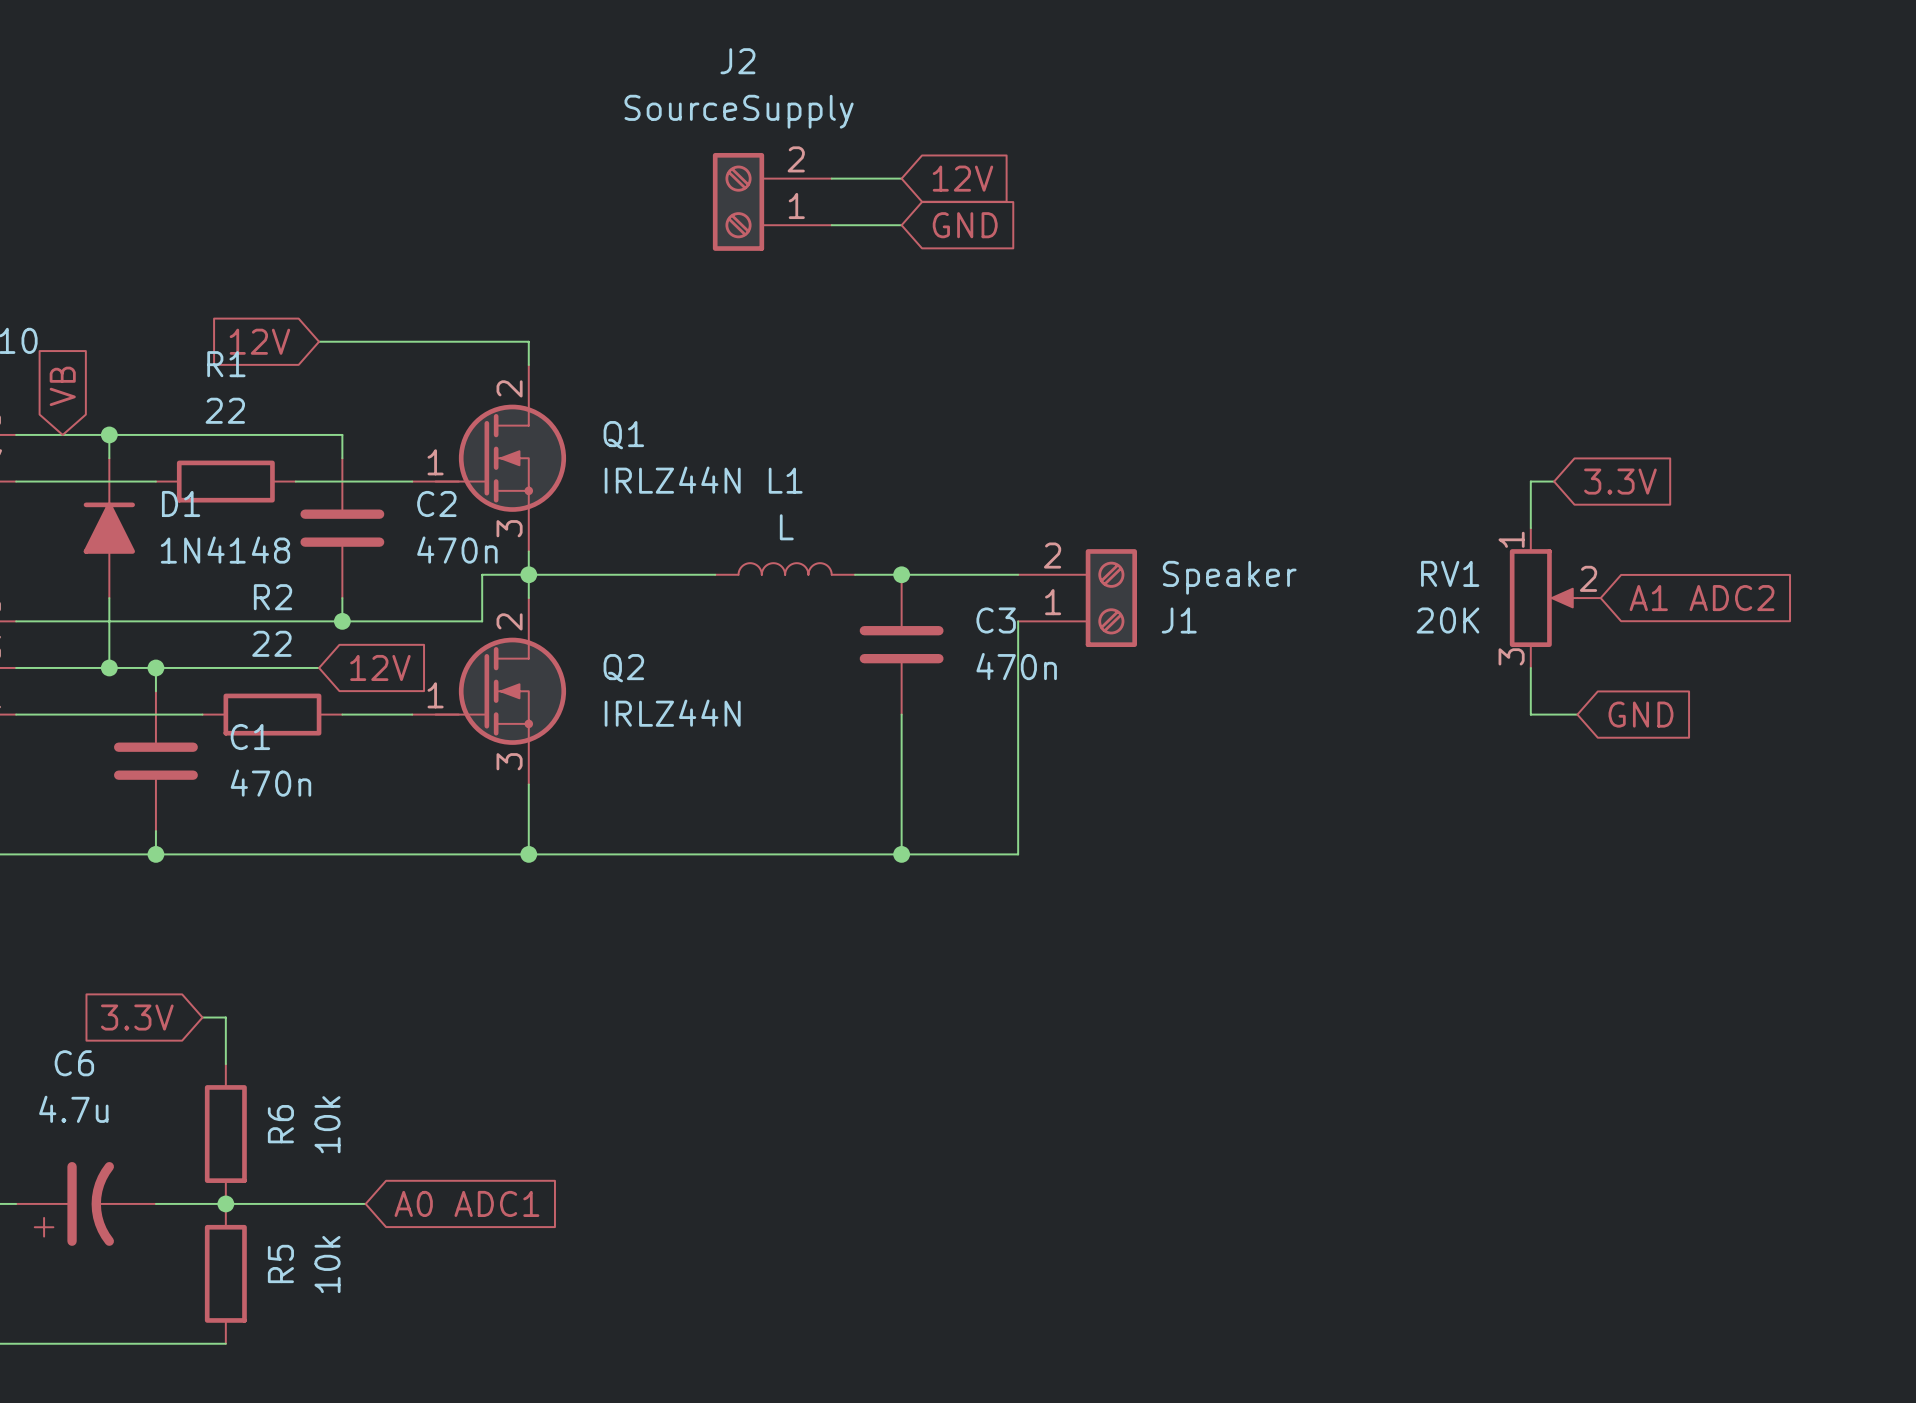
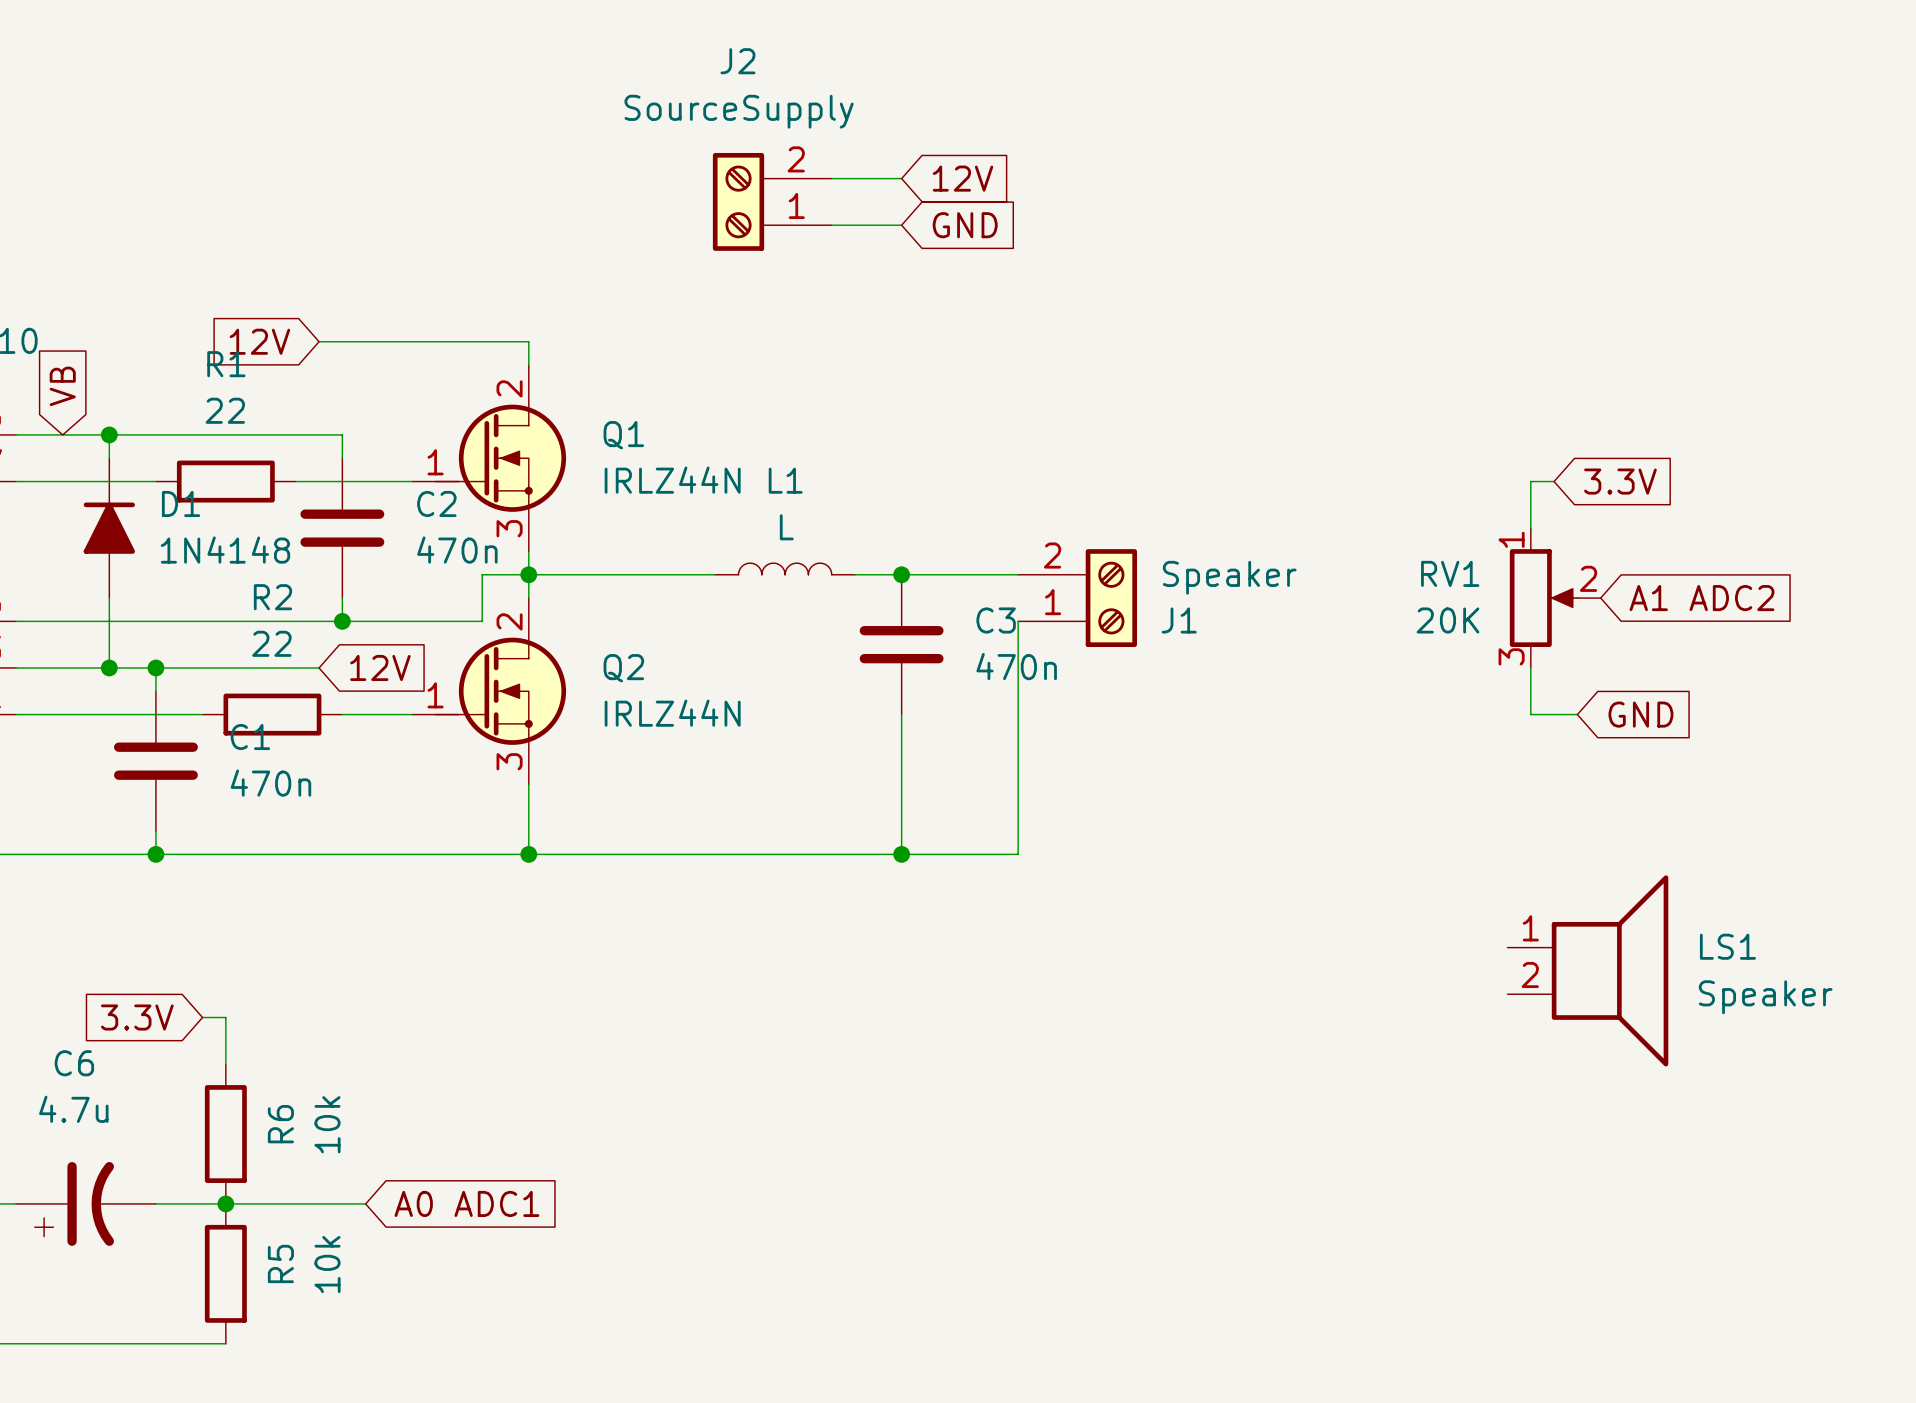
LS1: none -> Speaker (1587, 970)

